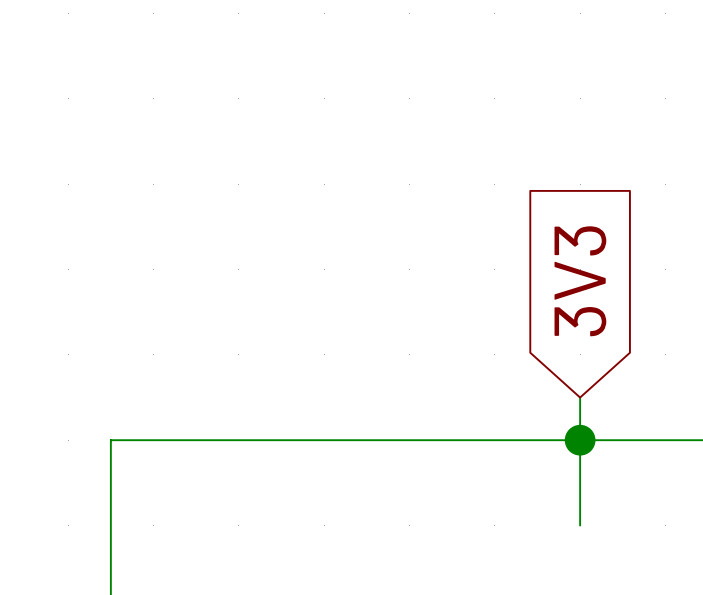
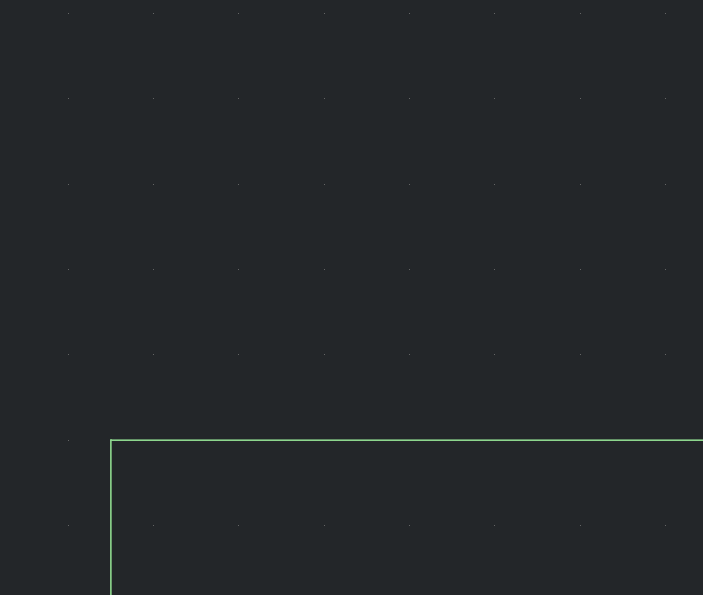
global label: 3V3 (580, 281) -> none
wire: (580, 397) (580, 525) -> none
junction: (580, 440) -> none

